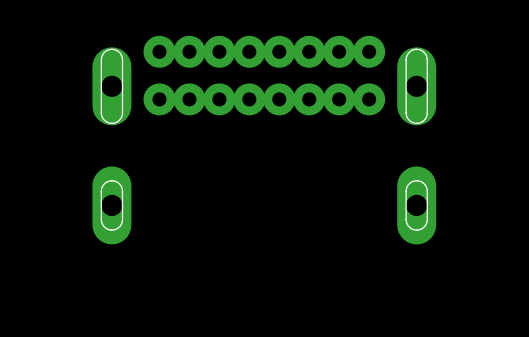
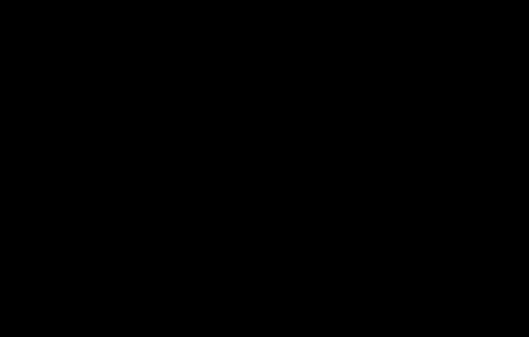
part: (264, 140) -> none

